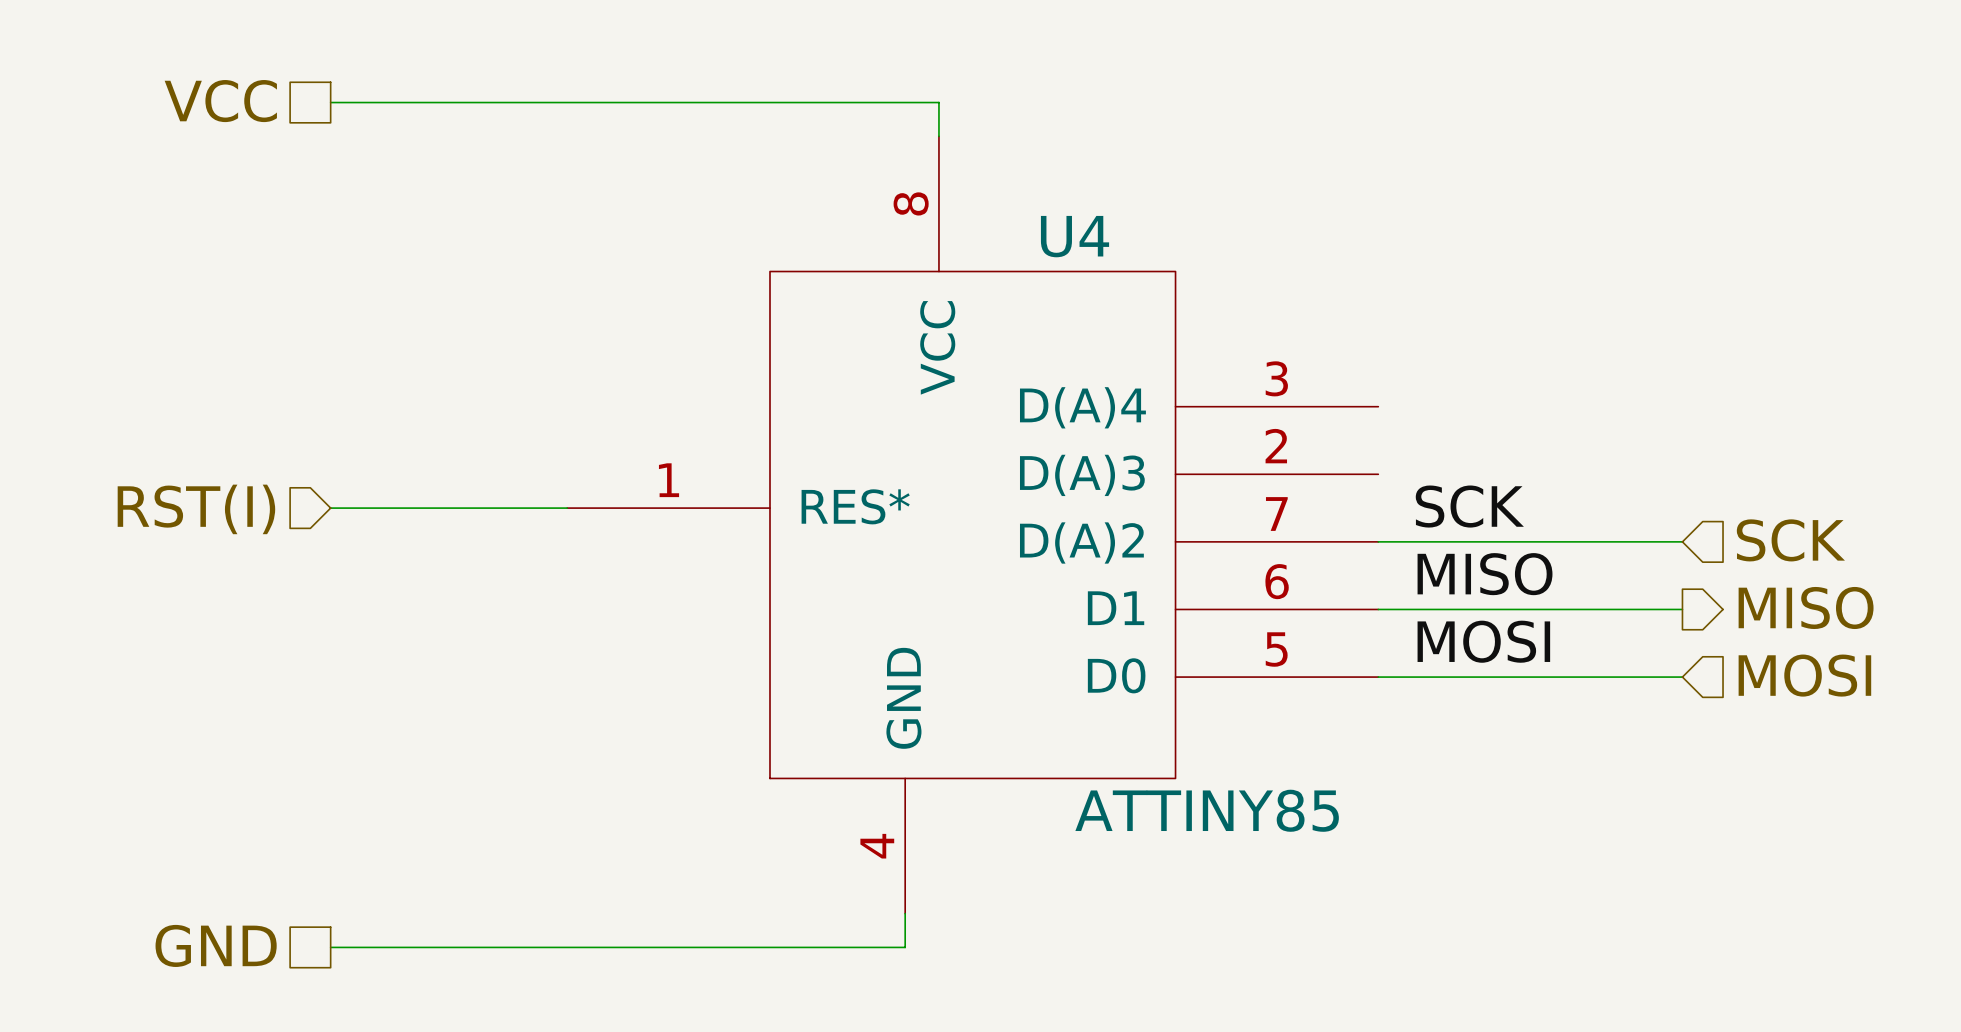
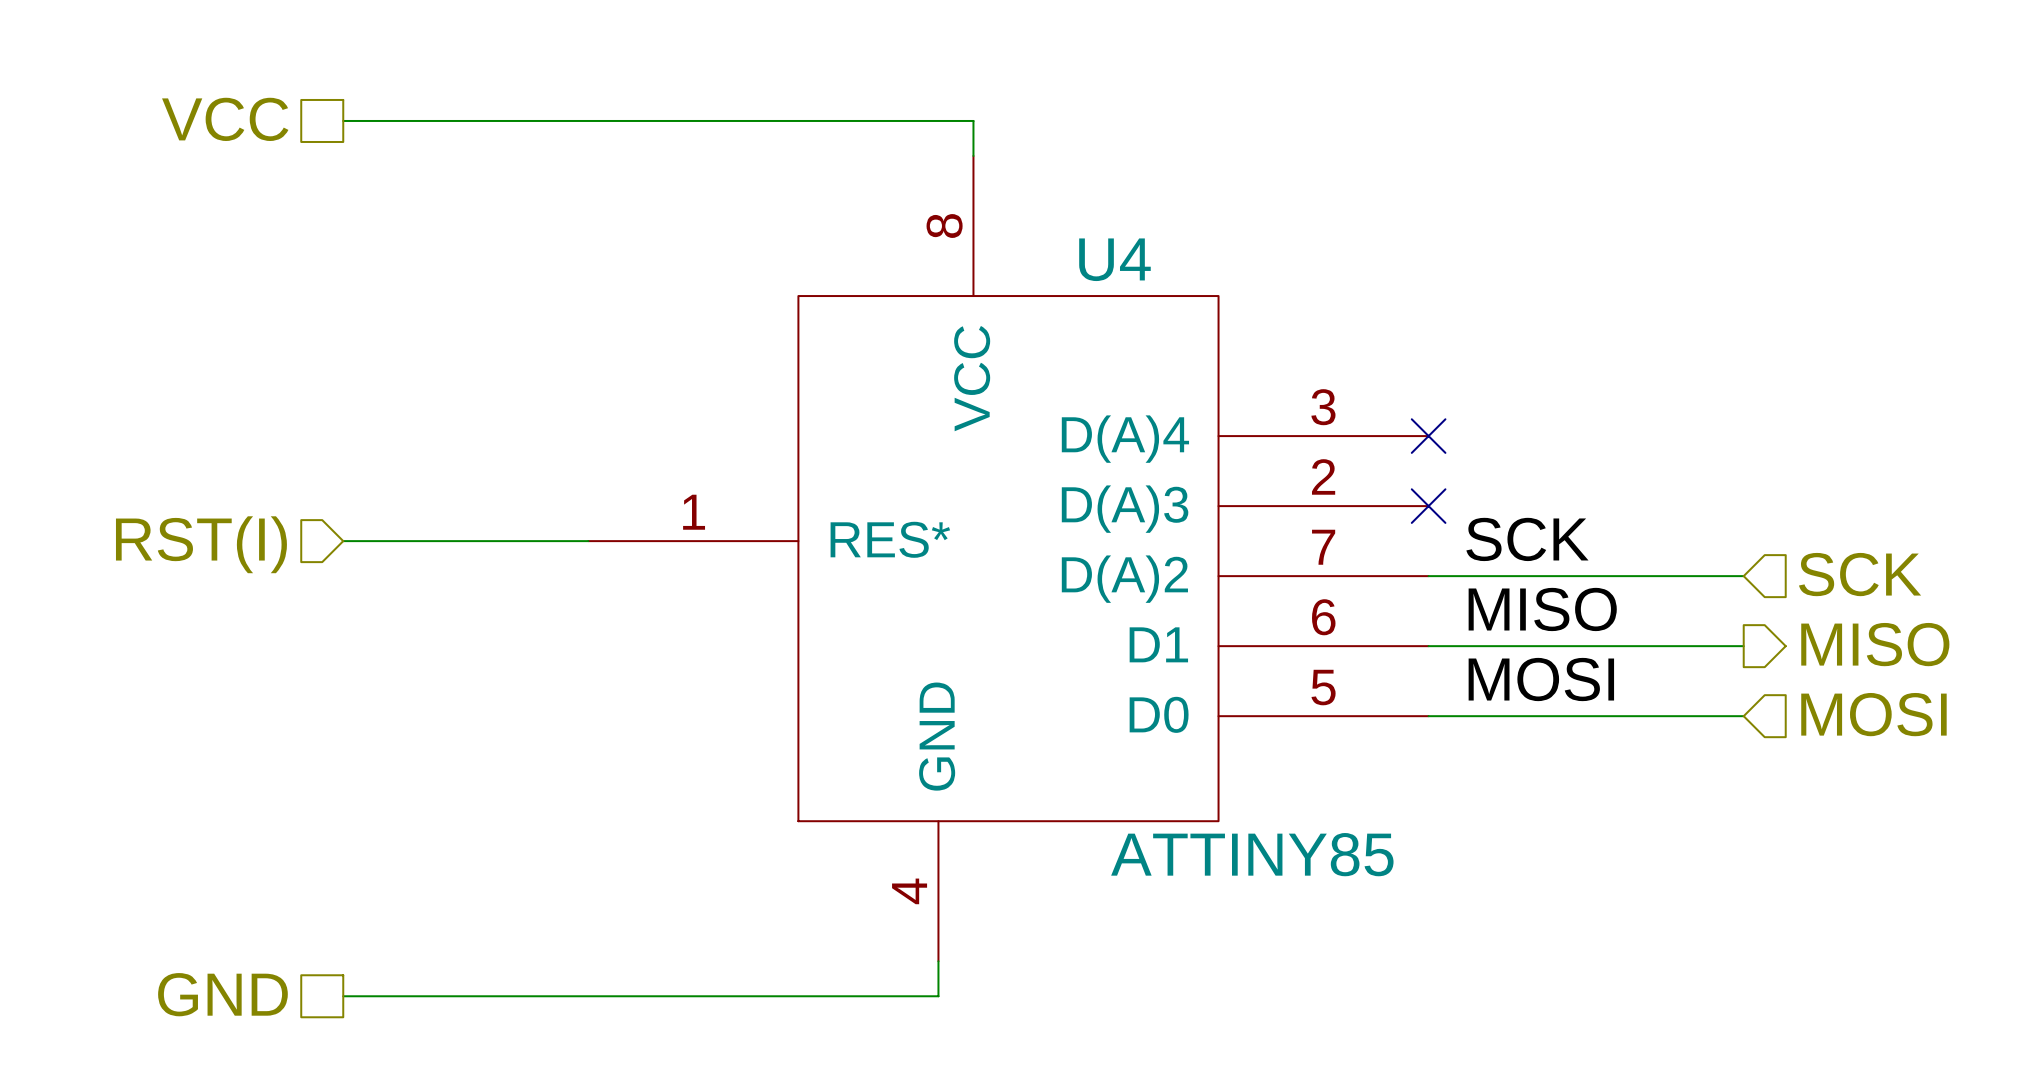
no-connect mark: none -> (1428, 436)
no-connect mark: none -> (1428, 506)

